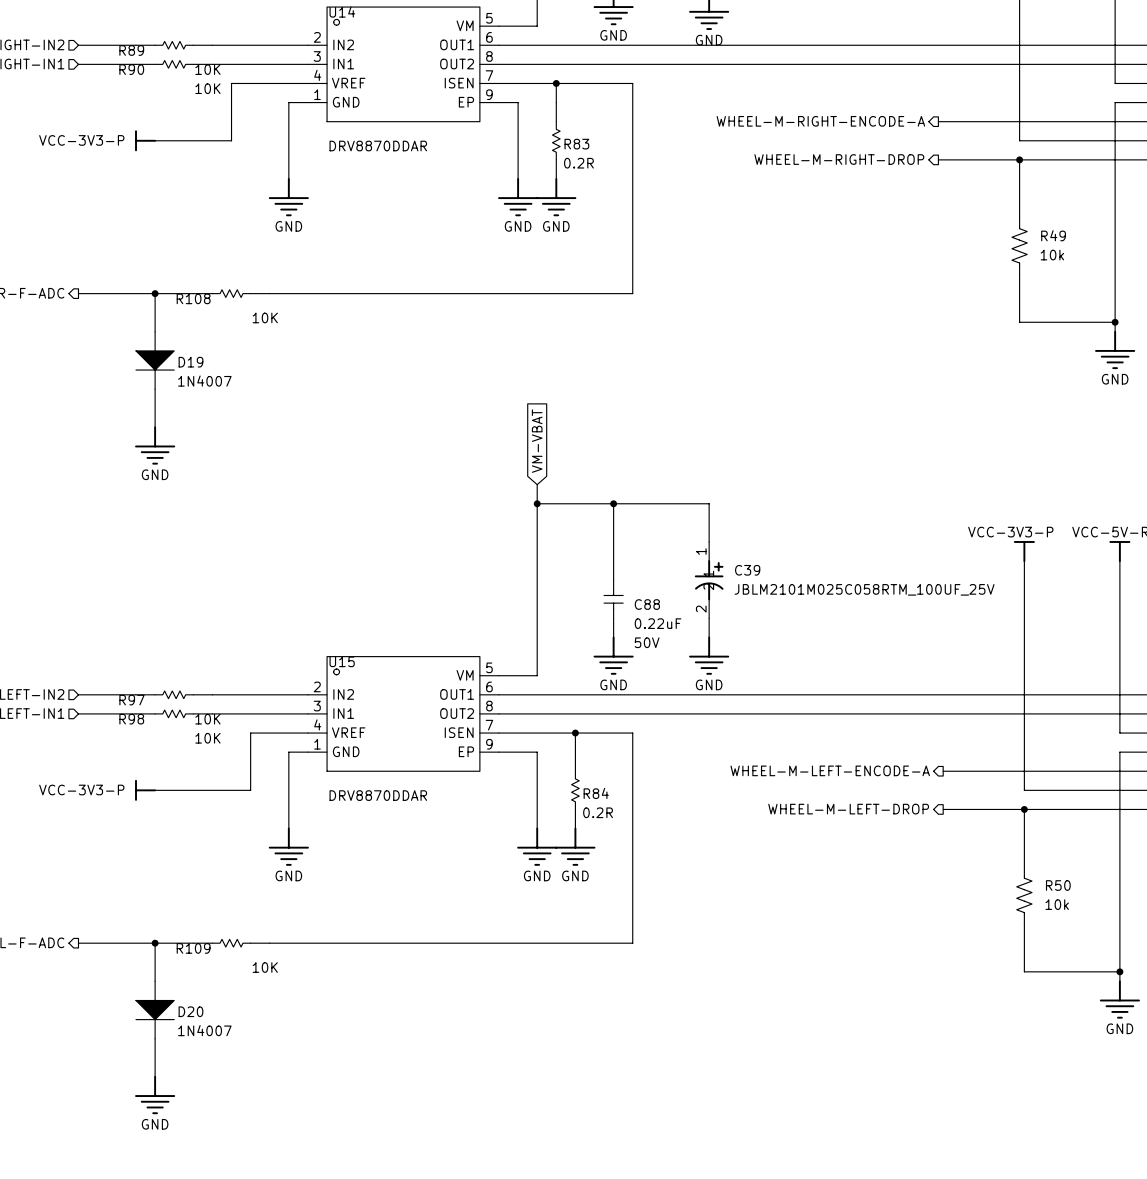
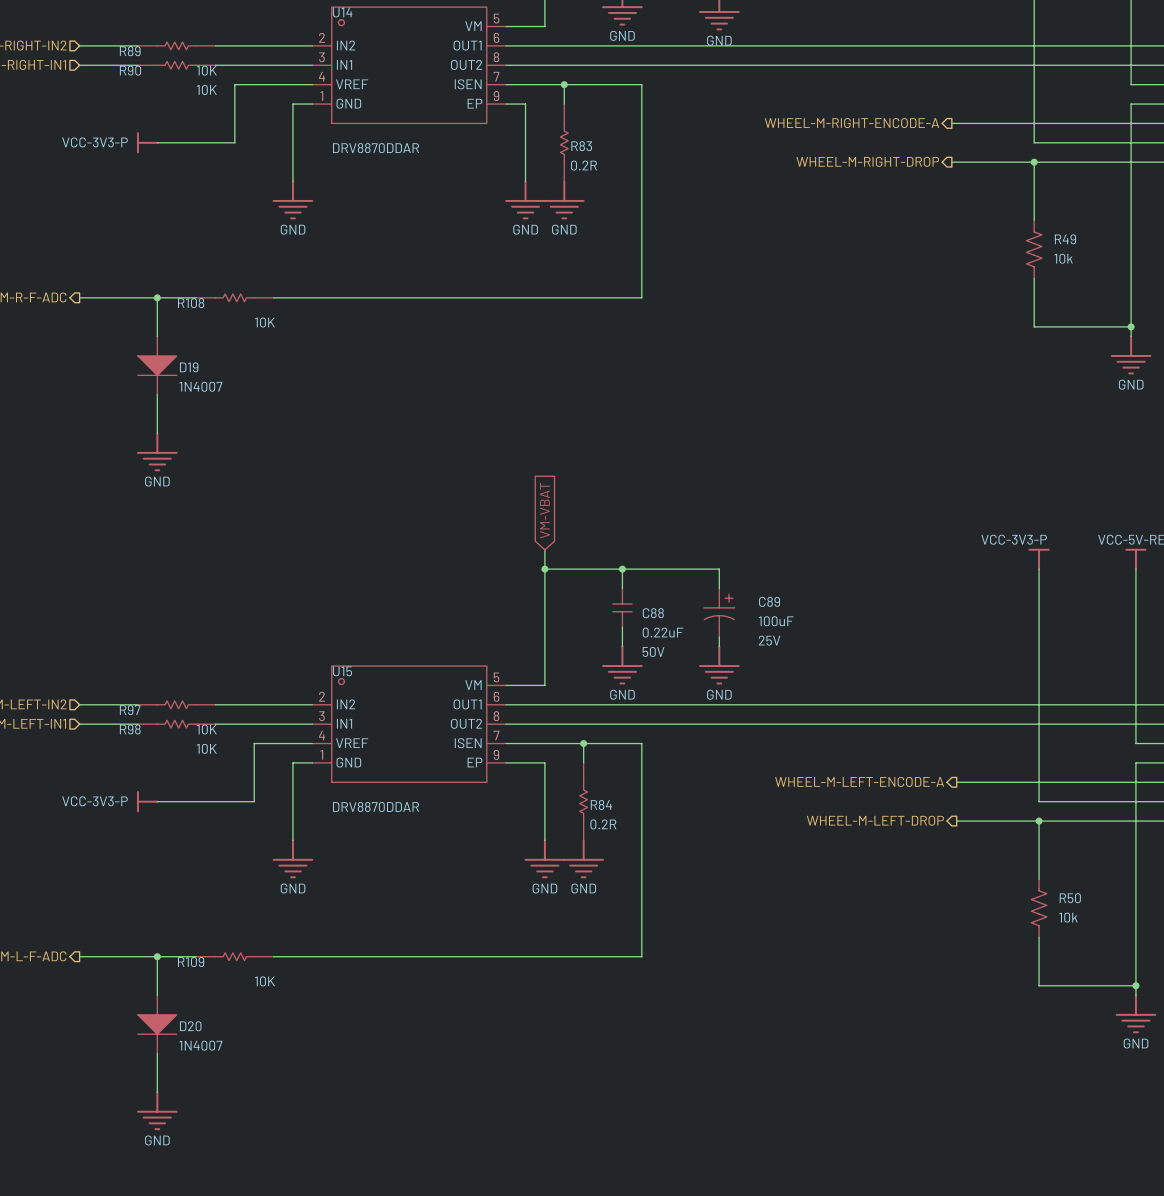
global label position: VM-VBAT (537, 441) -> VM-VBAT (544, 510)
wire: (537, 484) (537, 541) -> none
wire: (537, 503) (709, 503) (709, 541) -> none
junction: (537, 503) -> none
wire: (613, 503) (613, 561) -> none
junction: (613, 503) -> none
wire: none -> (544, 569) (719, 569) (719, 588)
junction: none -> (544, 569)
junction: none -> (622, 569)
C39: JBLM2101M025C058RTM_100UF_25V (709, 580) -> none
C89: none -> 100uF (719, 612)

